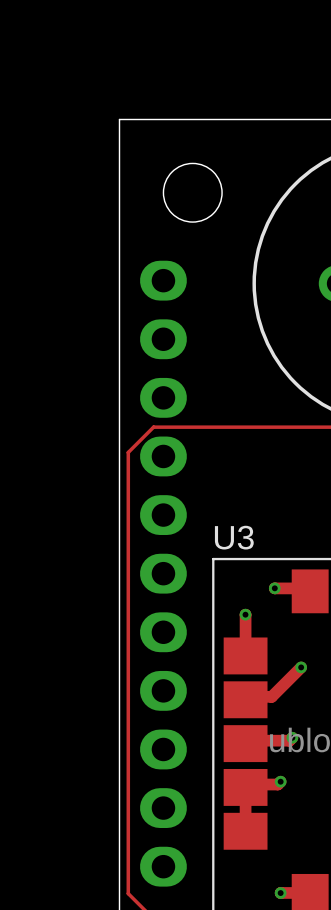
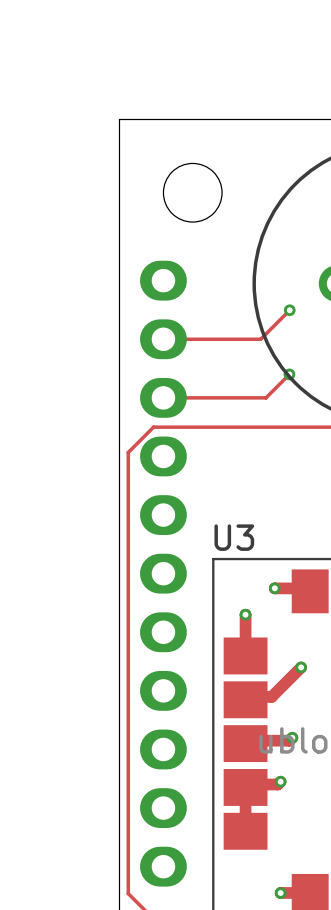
track: none -> (289, 310) (260, 339) (163, 339)
via: none -> (289, 310)
track: none -> (289, 374) (266, 397) (163, 397)
via: none -> (289, 374)

